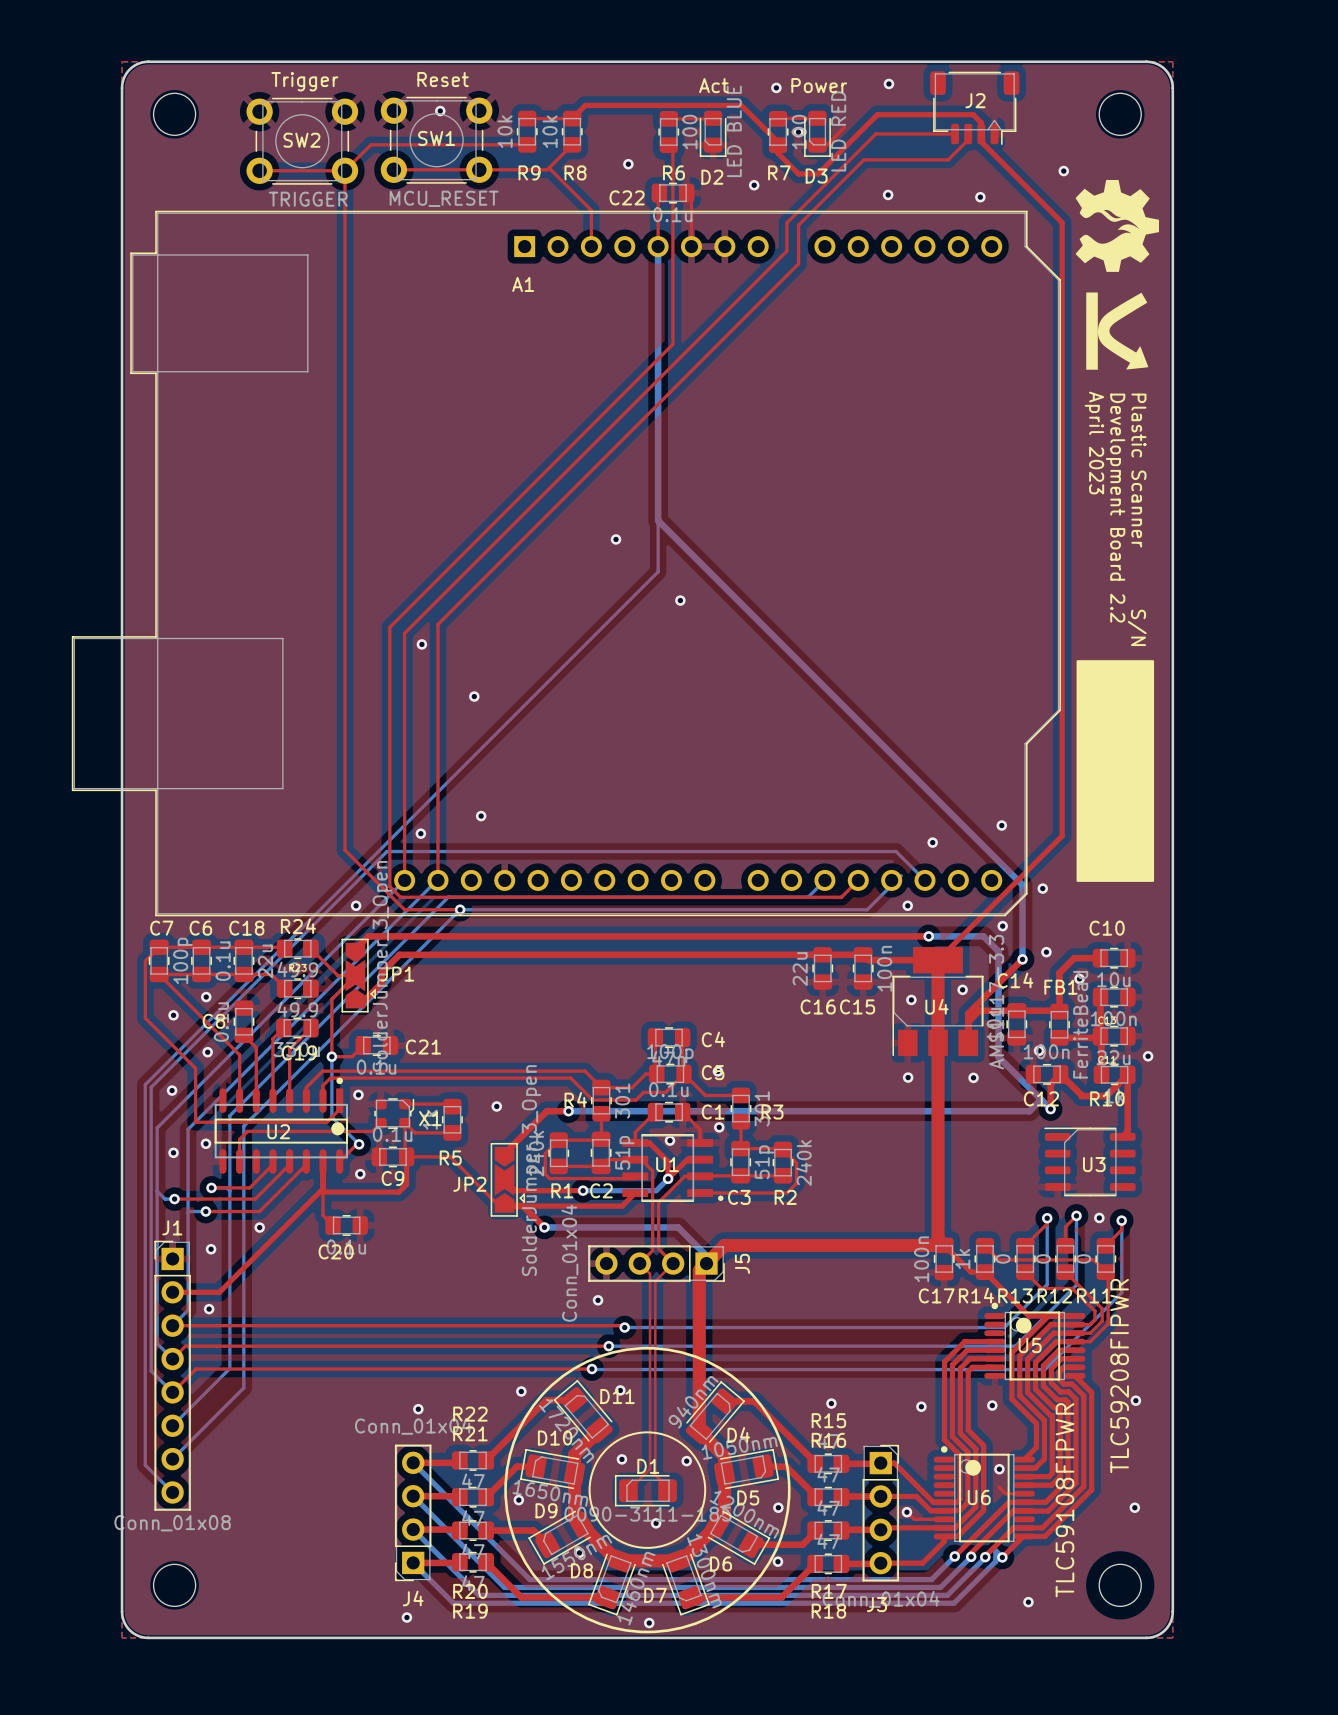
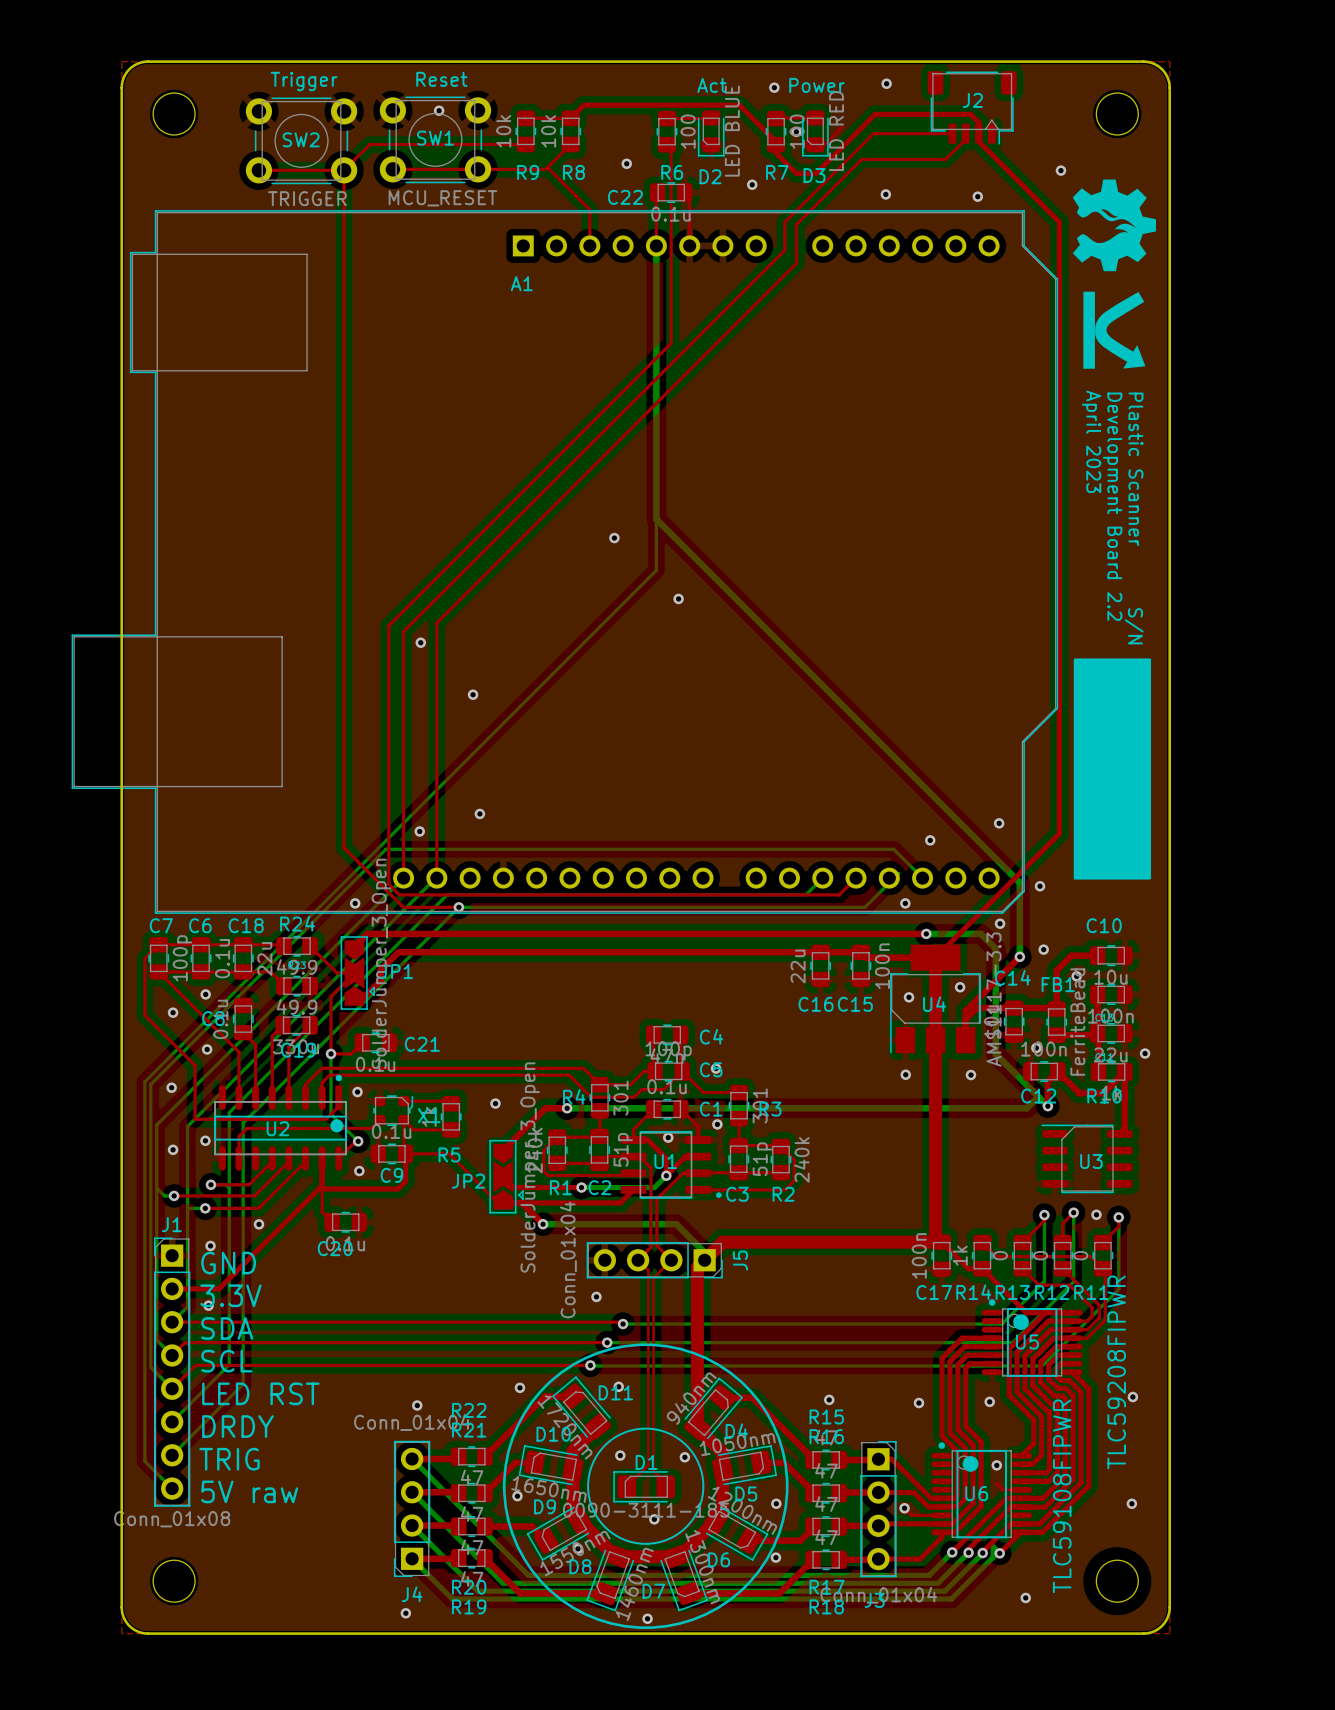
text: none -> GND (228, 1263)
text: none -> 3.3V (230, 1295)
text: none -> SDA (227, 1328)
text: none -> SCL (226, 1361)
text: none -> LED RST (260, 1393)
text: none -> DRDY (237, 1426)
text: none -> TRIG (229, 1459)
text: none -> 5V raw (249, 1491)

